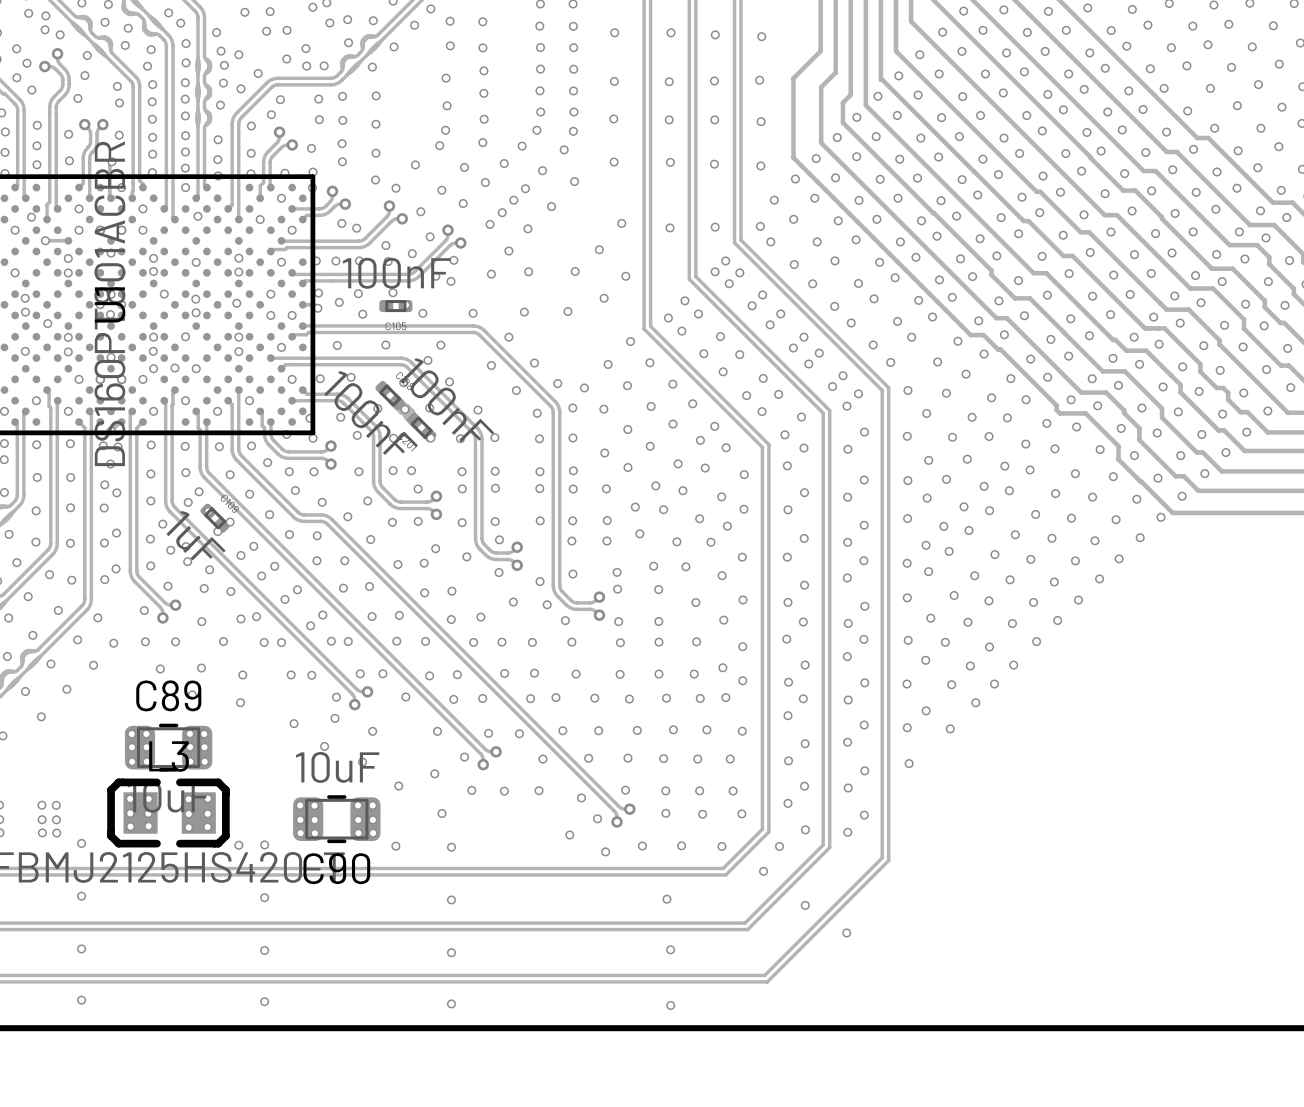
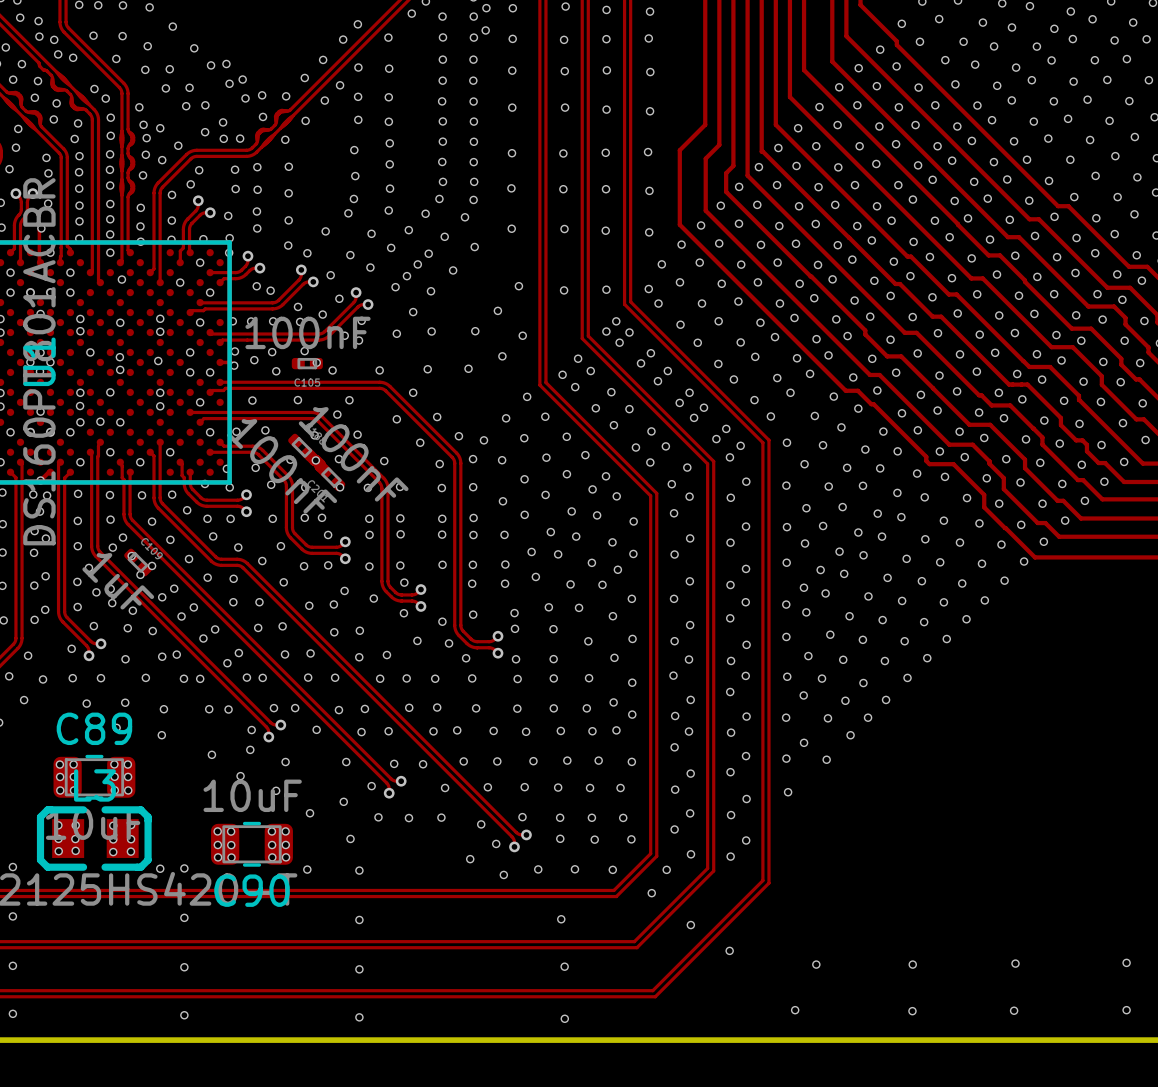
via: none -> (1126, 962)
via: none -> (1015, 963)
via: none -> (816, 964)
via: none -> (912, 964)
via: none -> (795, 1010)
via: none -> (1014, 1010)
via: none -> (1126, 1010)
via: none -> (912, 1011)

